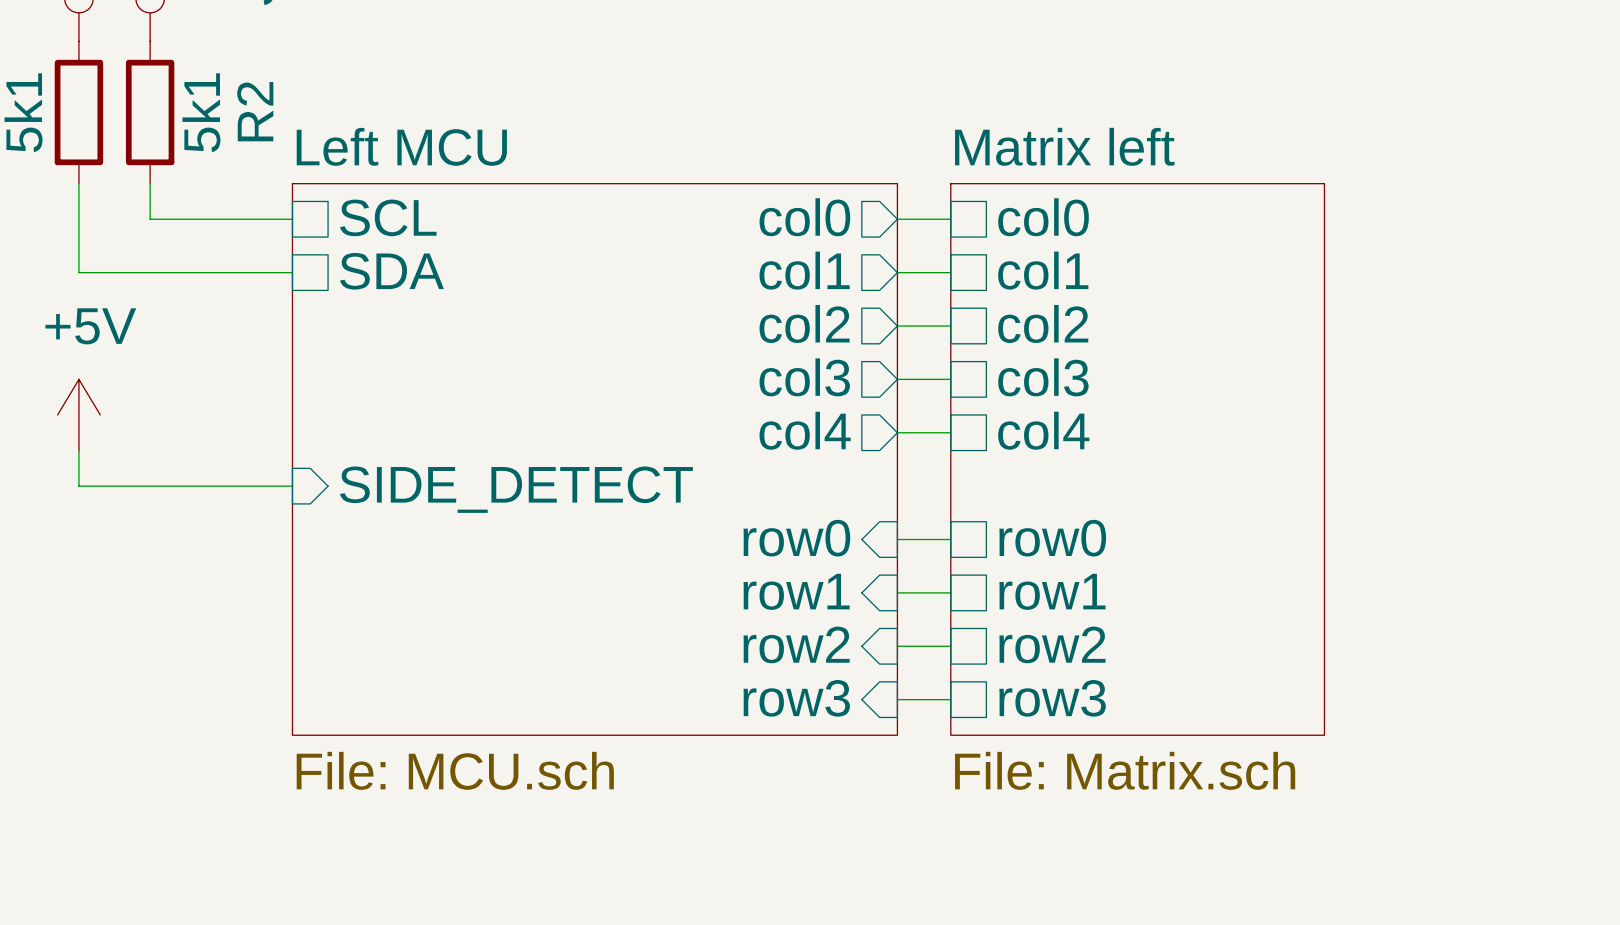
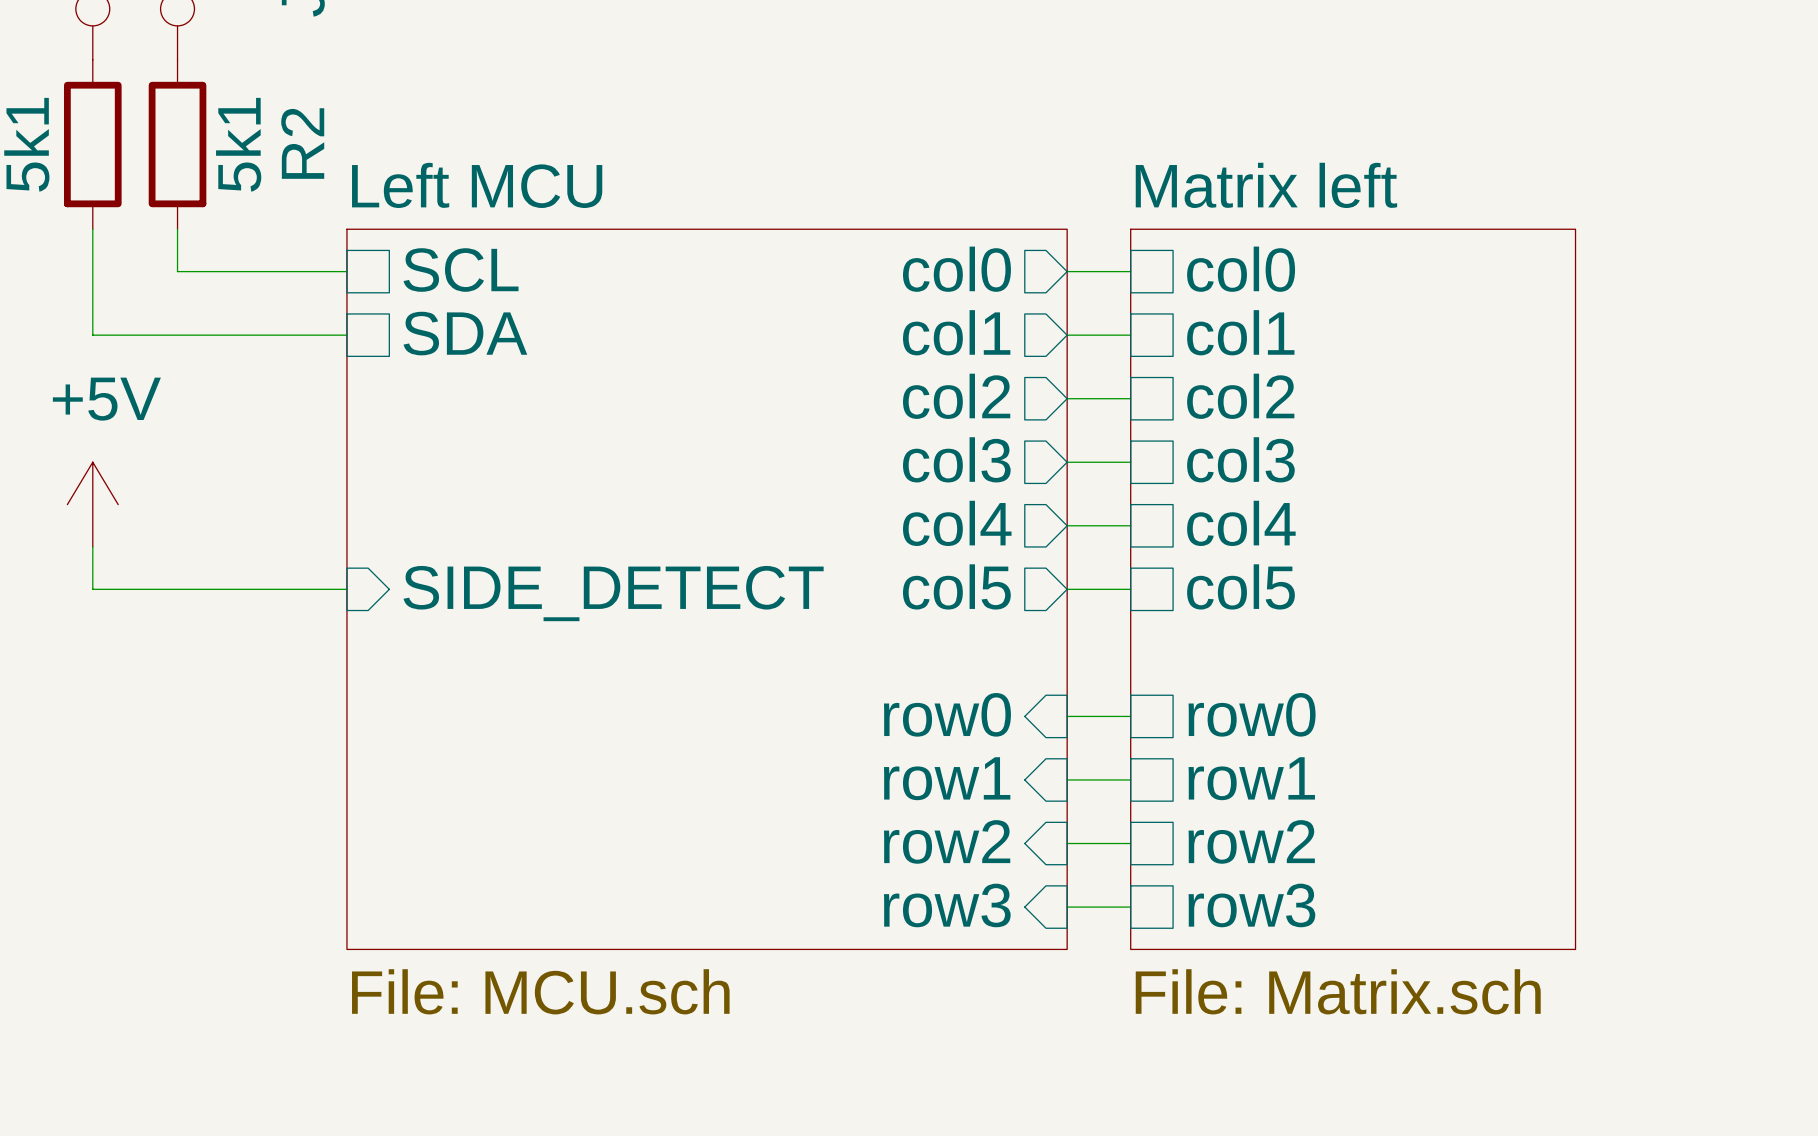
sheet Left MCU shape: [292, 183, 898, 736] -> [346, 229, 1068, 950]
sheet Matrix left shape: [950, 183, 1325, 736] -> [1130, 229, 1576, 950]
sheet pin: none -> col5 (956, 586)
sheet pin: none -> col5 (1241, 586)
sheet pin: row0 (796, 538) -> none
sheet pin: row0 (1052, 538) -> none
wire: (897, 539) (950, 539) -> (1067, 589) (1130, 589)
sheet pin: row1 (796, 591) -> row0 (947, 714)
sheet pin: row1 (1052, 591) -> row0 (1252, 714)
sheet pin: row2 (796, 644) -> row1 (947, 778)
sheet pin: row2 (1052, 644) -> row1 (1251, 778)
sheet pin: row3 (796, 698) -> row2 (947, 841)
sheet pin: row3 (1052, 698) -> row2 (1251, 841)
sheet pin: none -> row3 (947, 905)
sheet pin: none -> row3 (1251, 905)
wire: none -> (1067, 907) (1130, 907)

